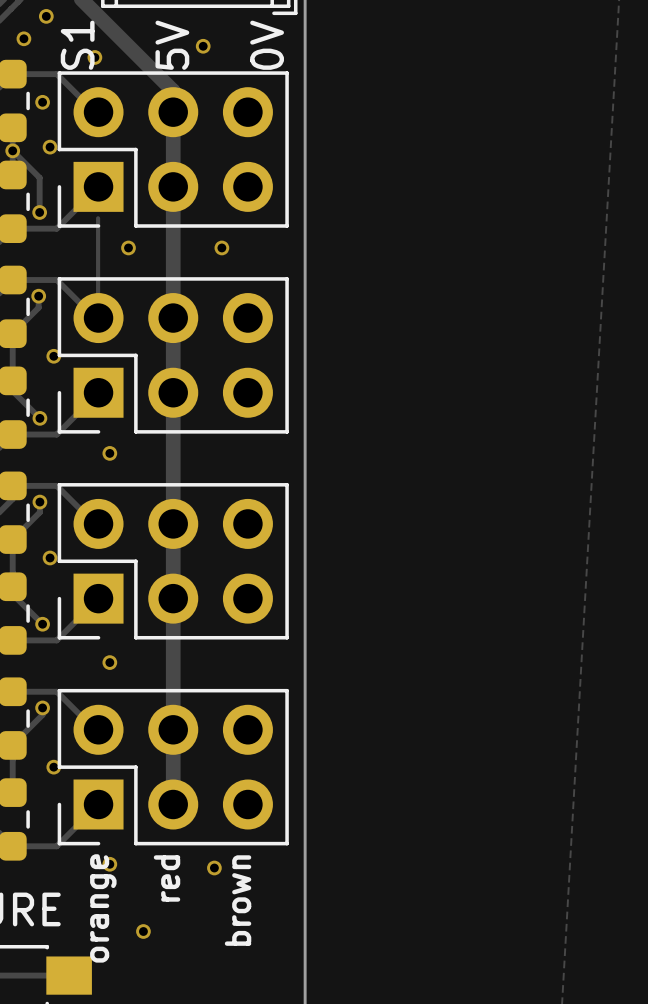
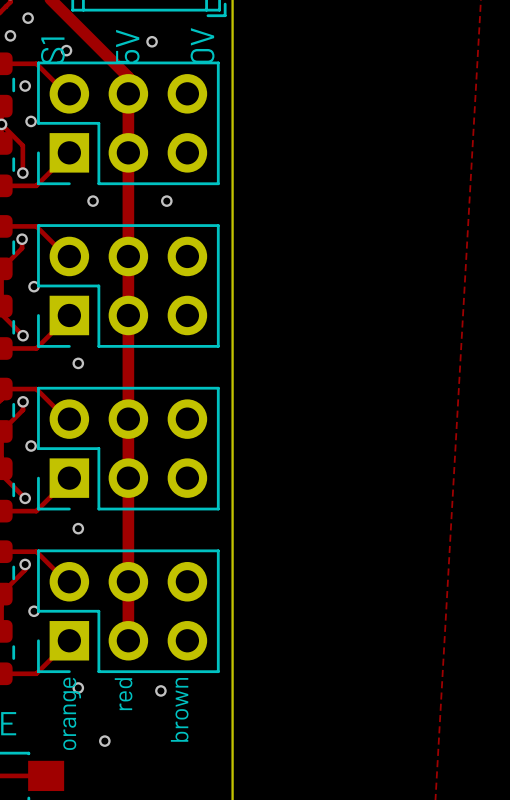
track: (98, 218) (98, 300) -> none

